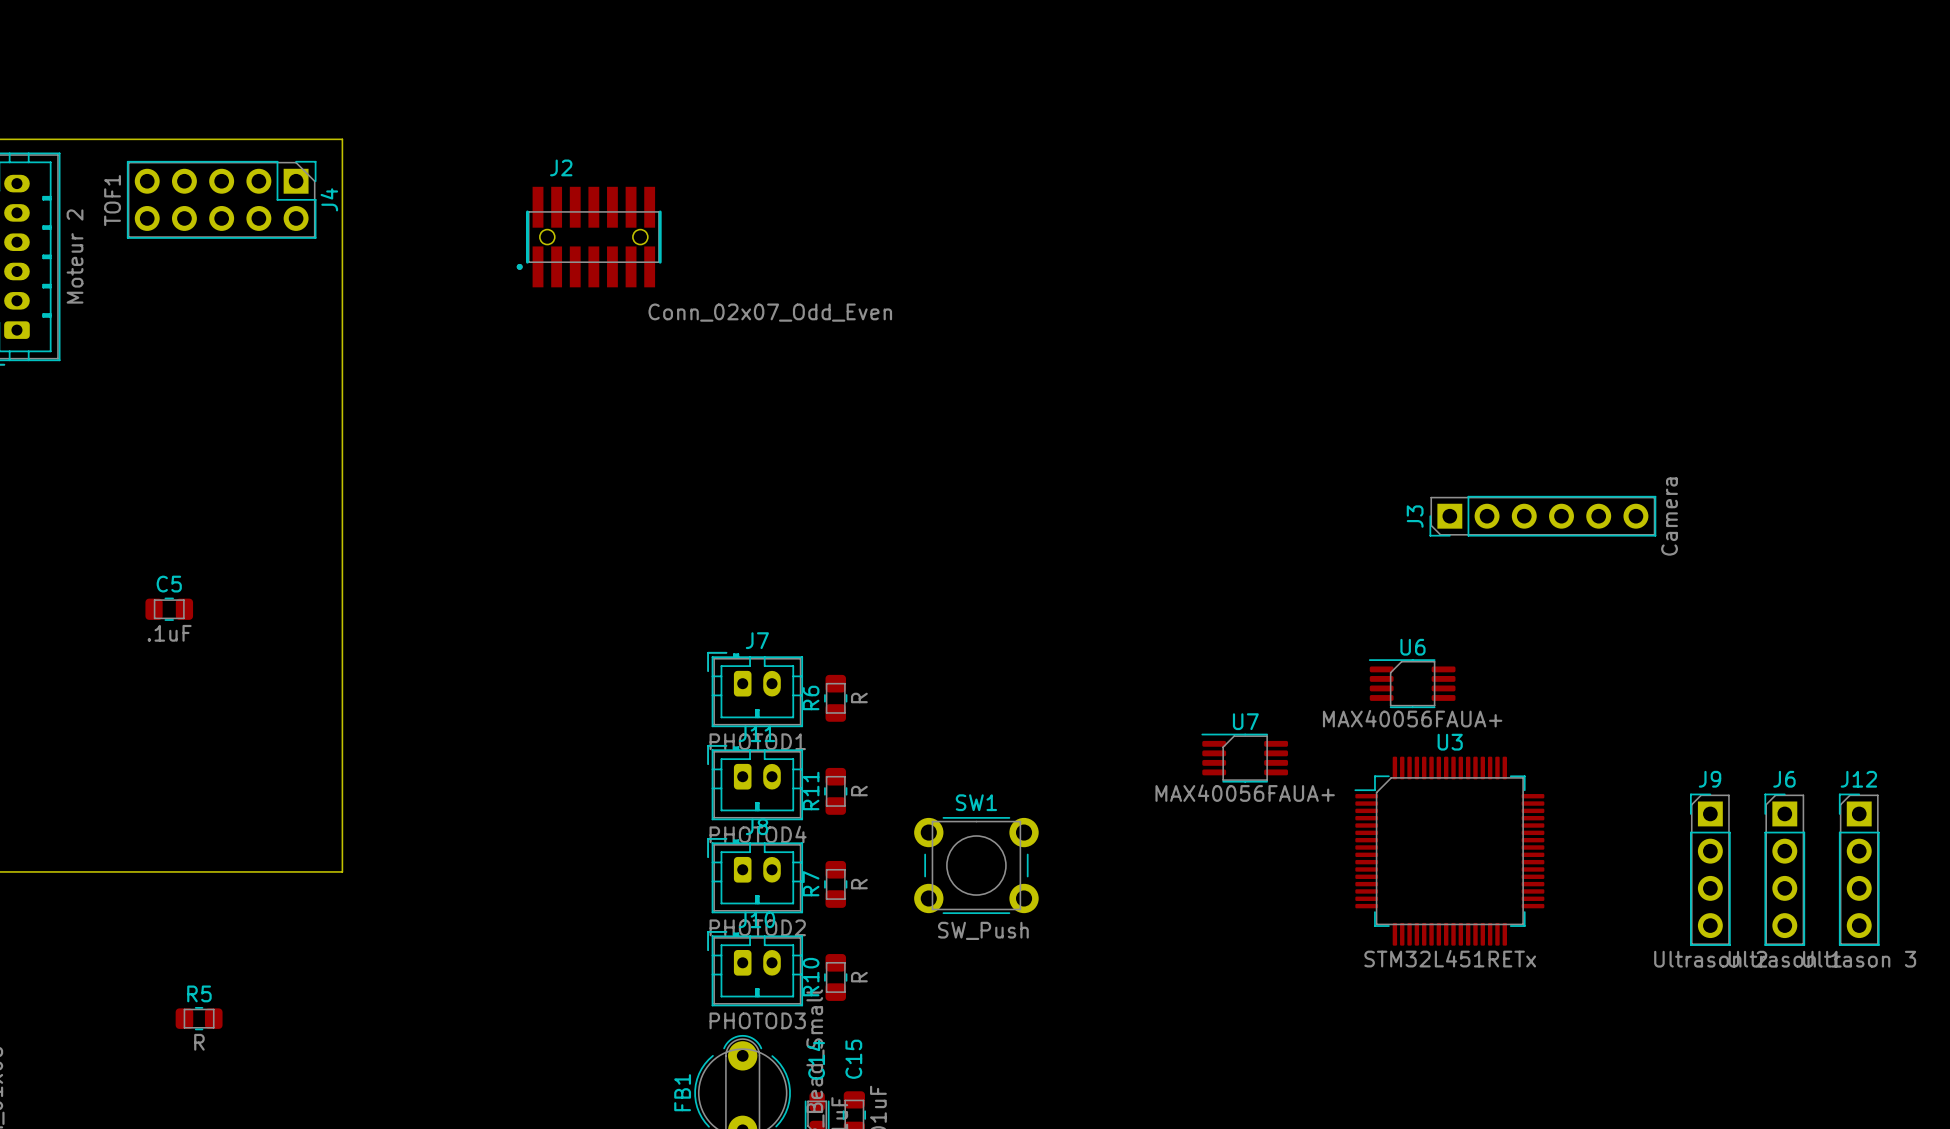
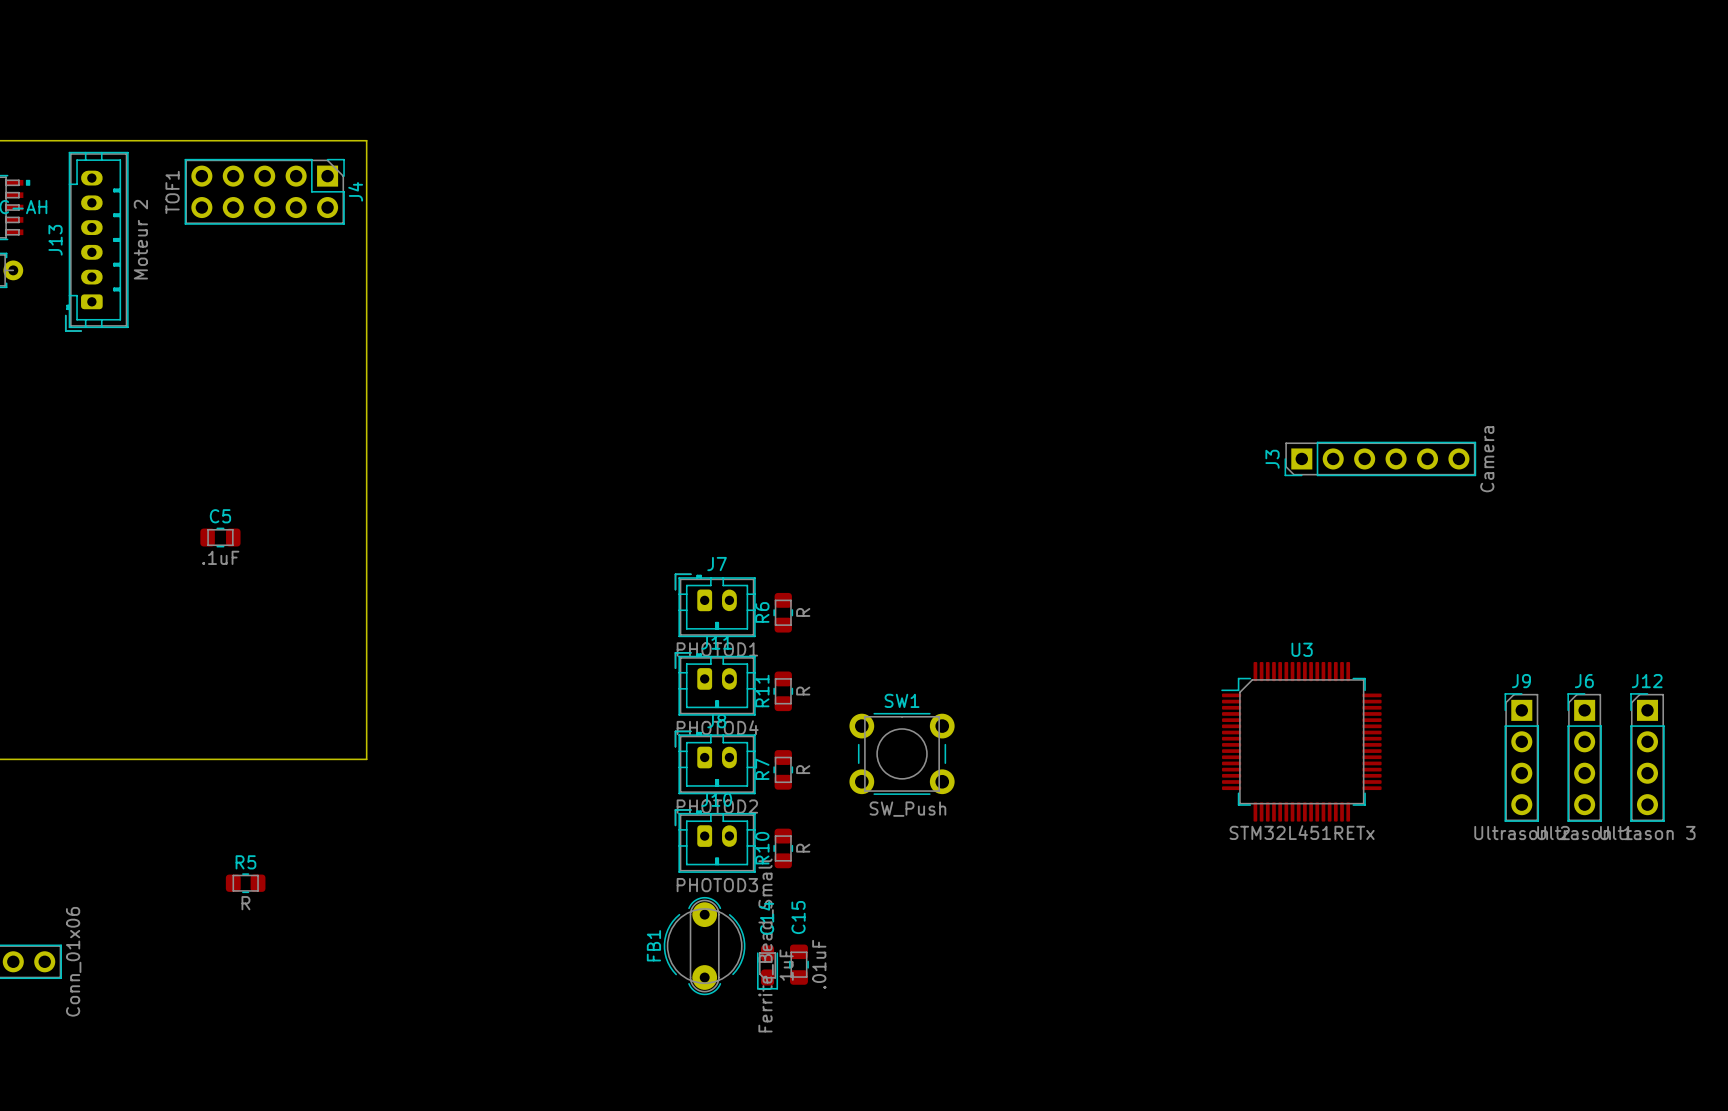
J2: Conn_02x07_Odd_Even (589, 237) -> none
U6: MAX40056FAUA+ (1412, 683) -> none
U7: MAX40056FAUA+ (1244, 758) -> none

